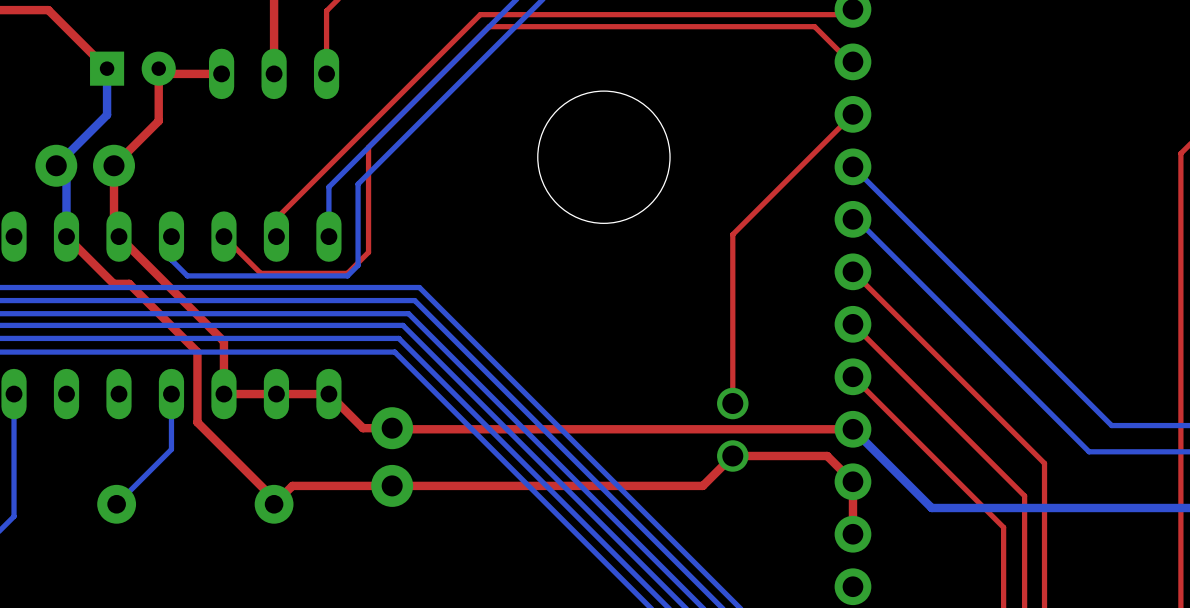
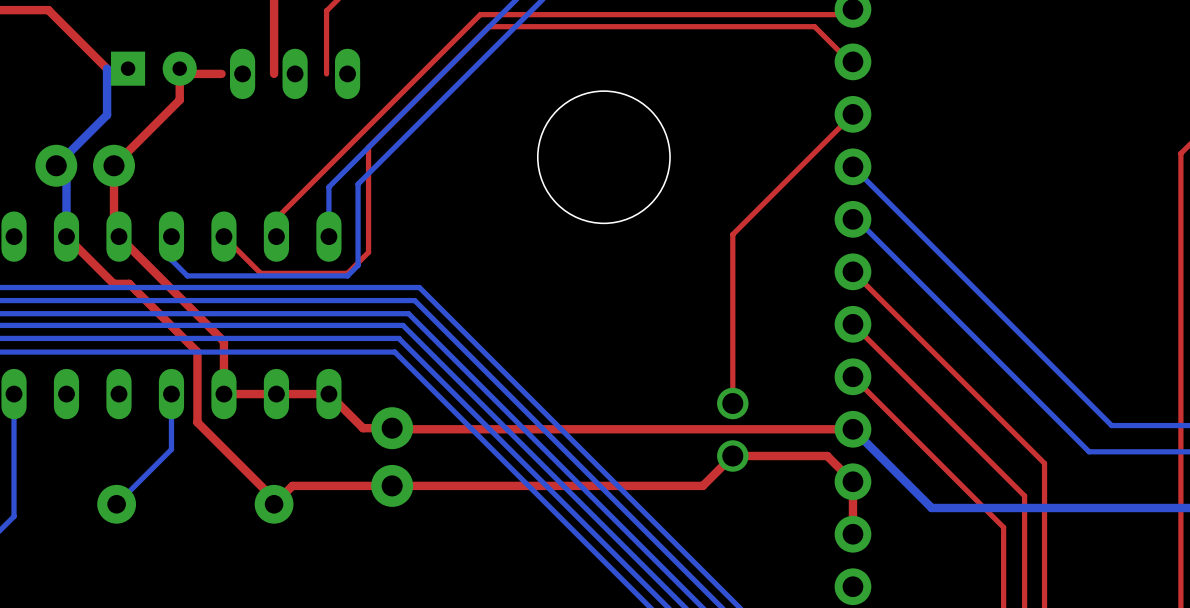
part position: (132, 68) -> (153, 68)
top track: (184, 73) (163, 73) (158, 68) (158, 121) -> (184, 73) (179, 68) (179, 100) (158, 121)
part position: (274, 73) -> (295, 73)

